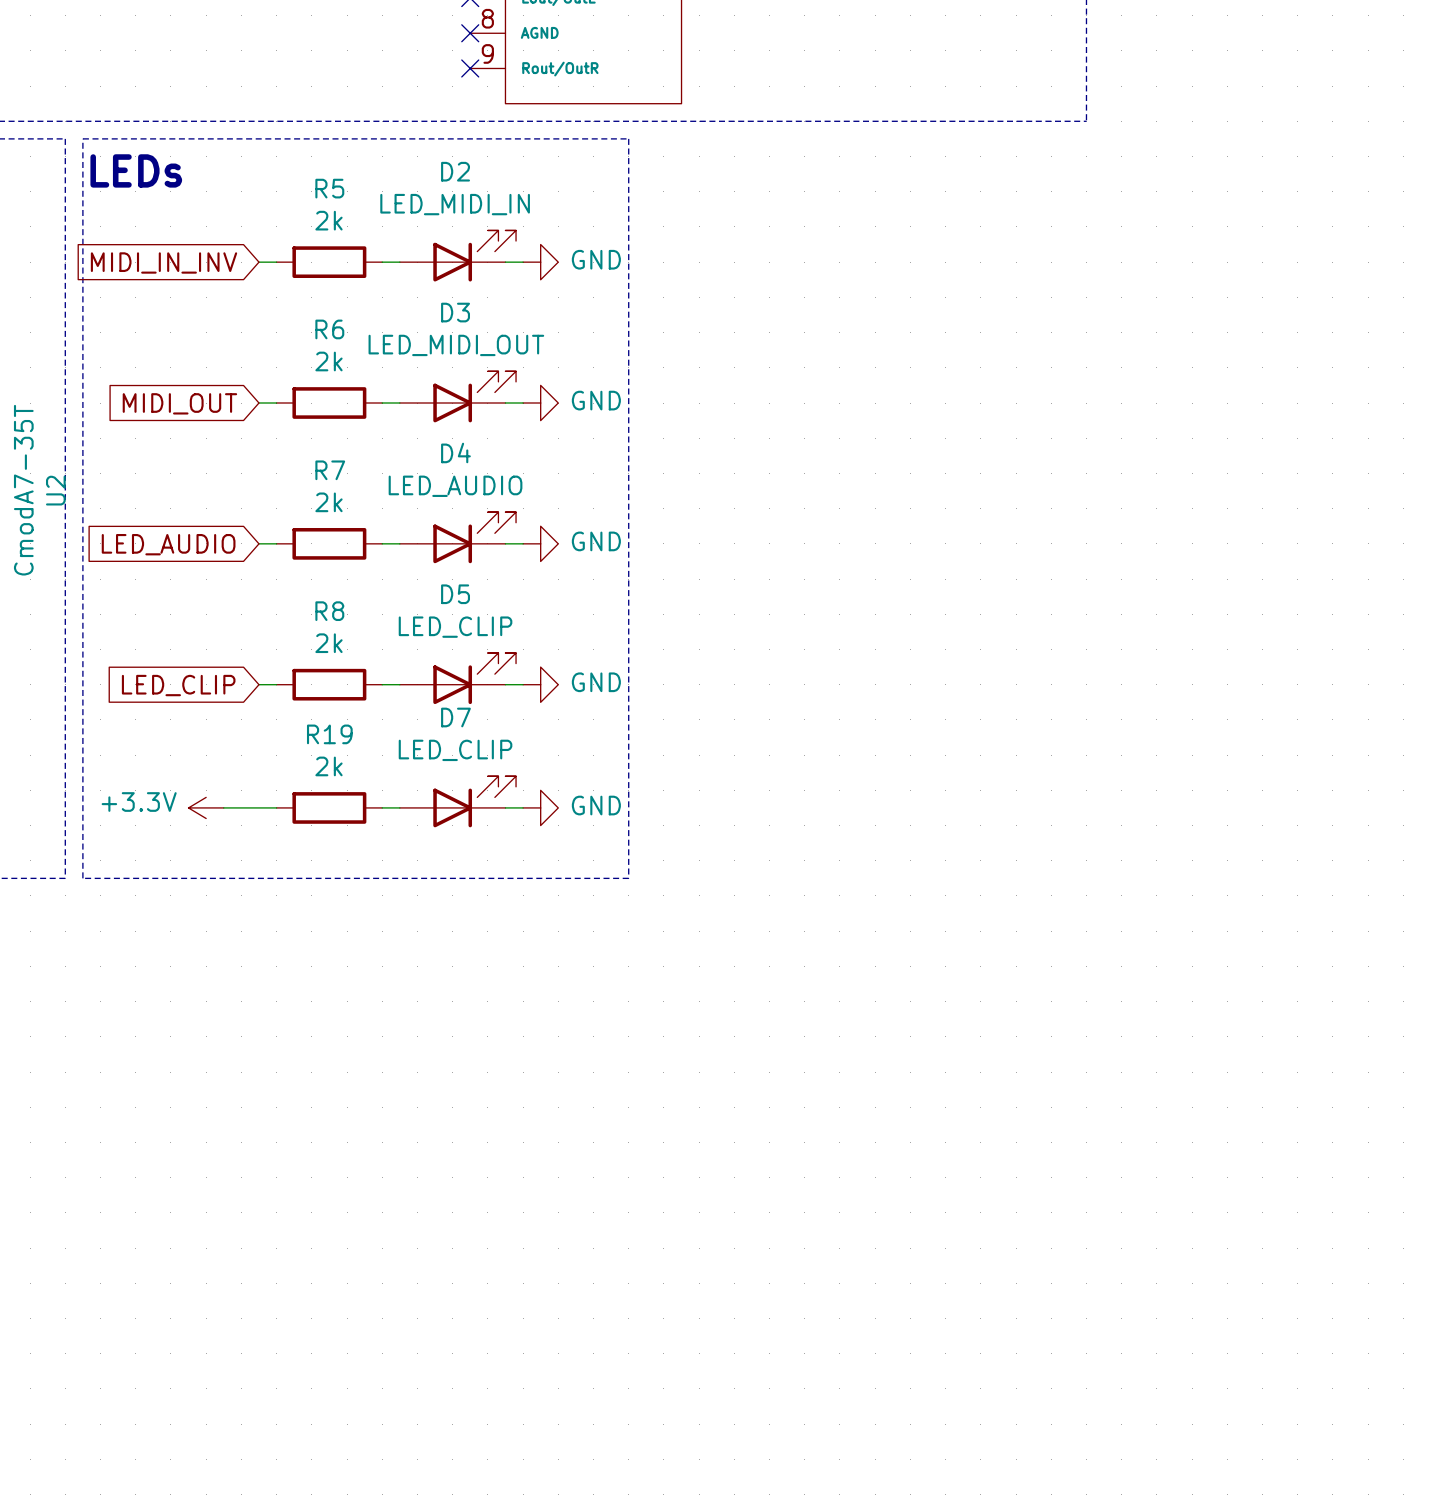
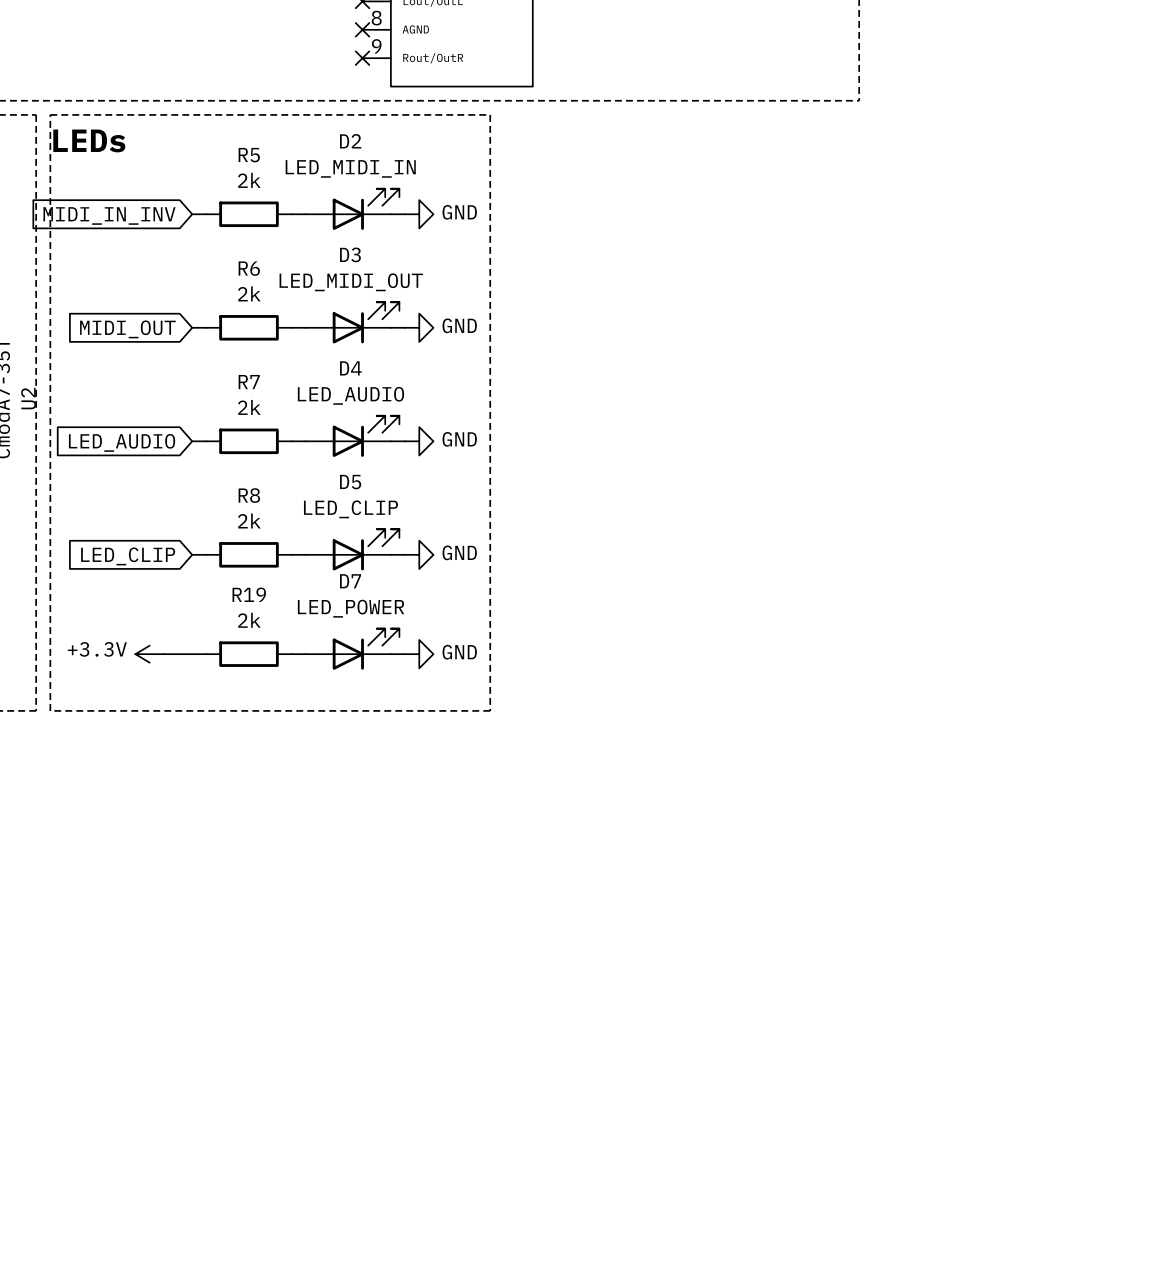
D7 value: LED_CLIP (455, 750) -> LED_POWER (351, 608)

